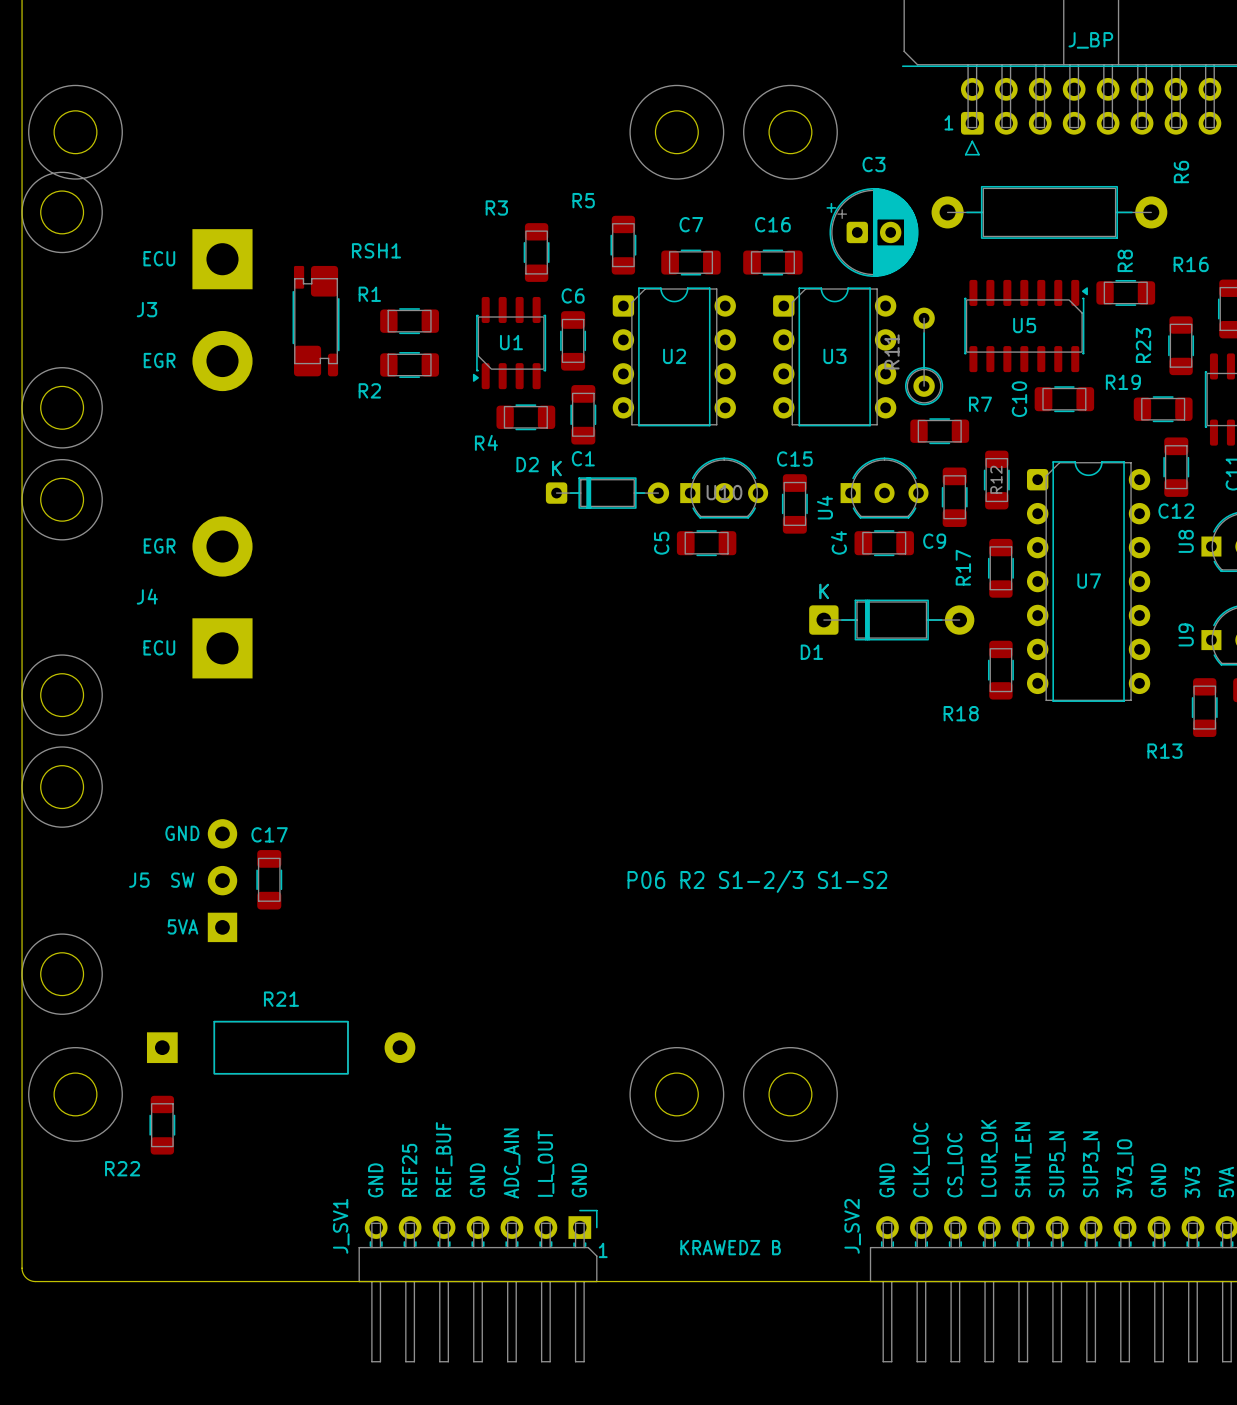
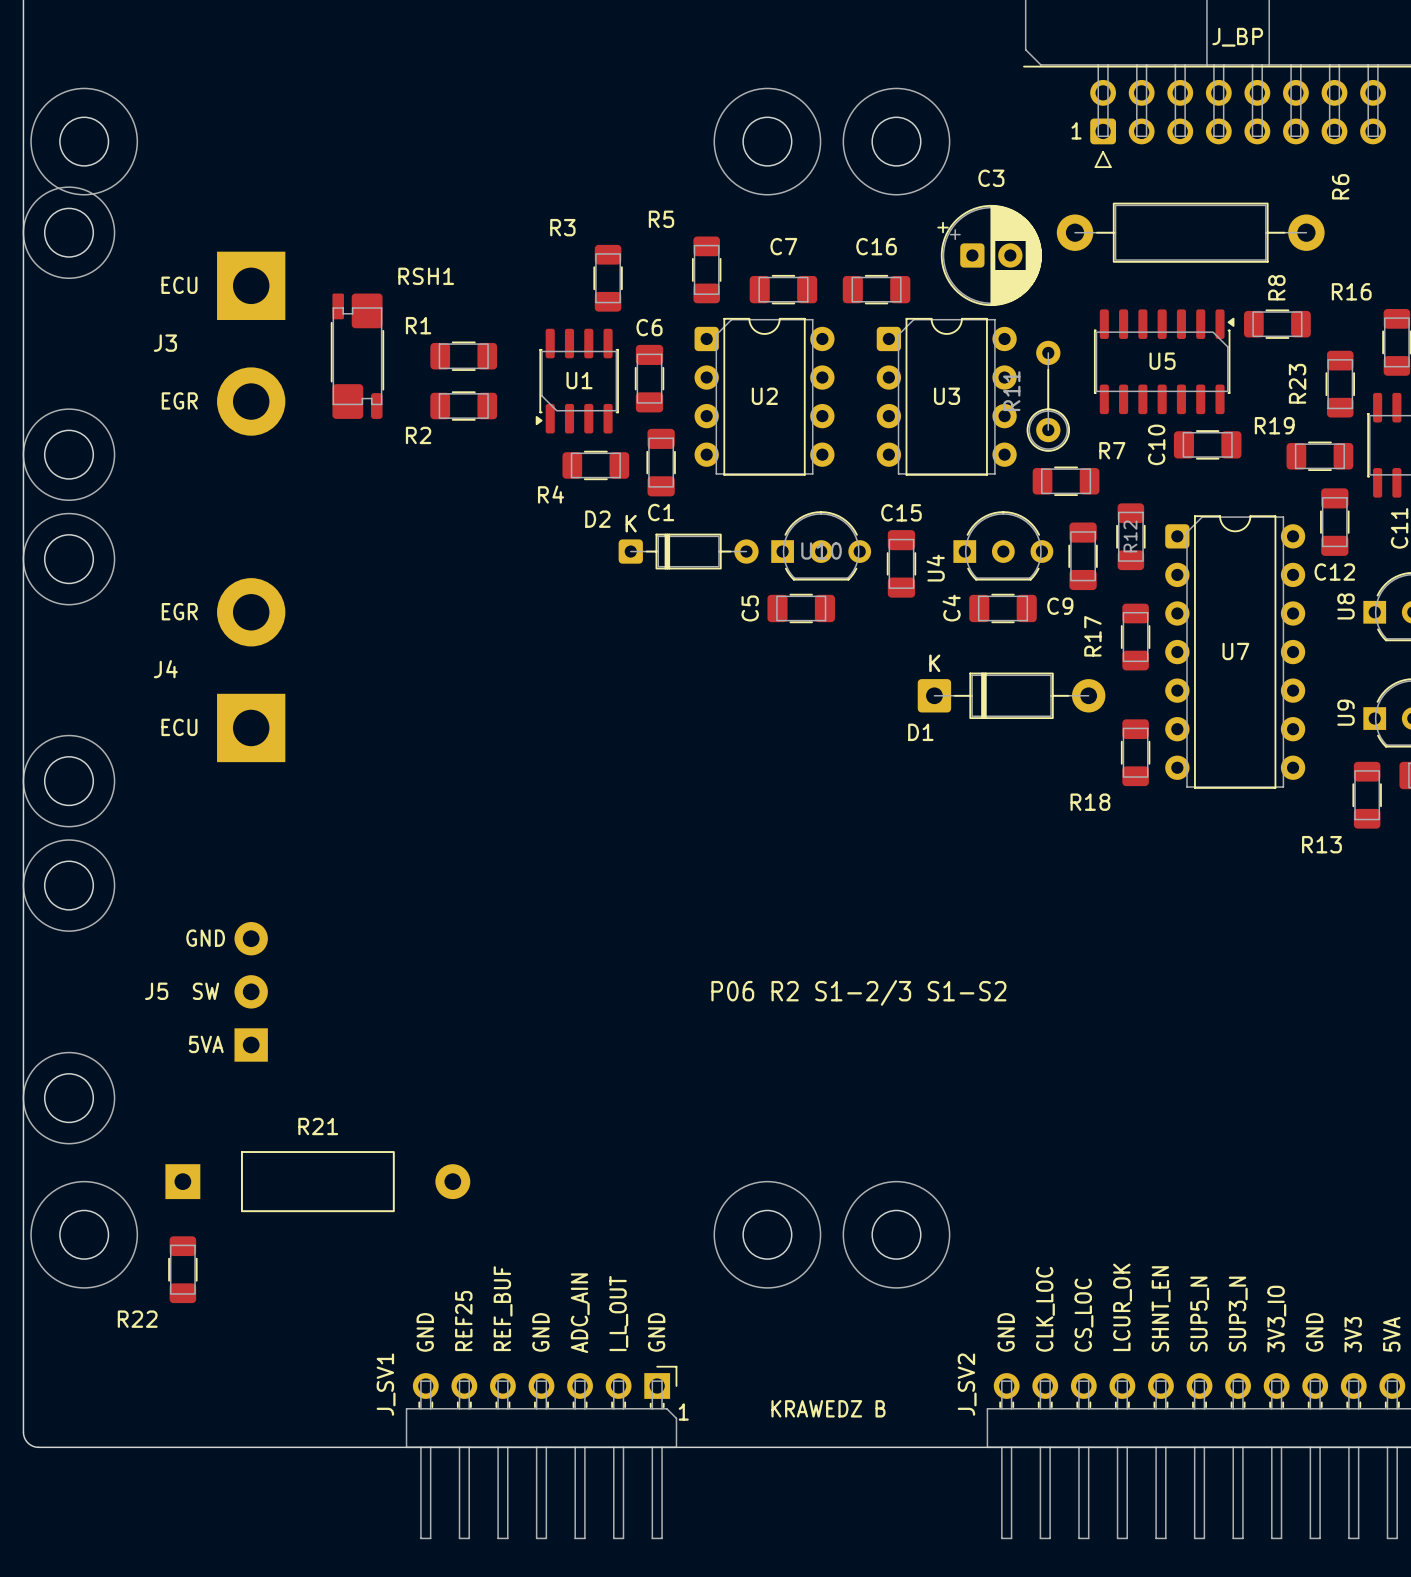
C17: (269, 879) -> none

